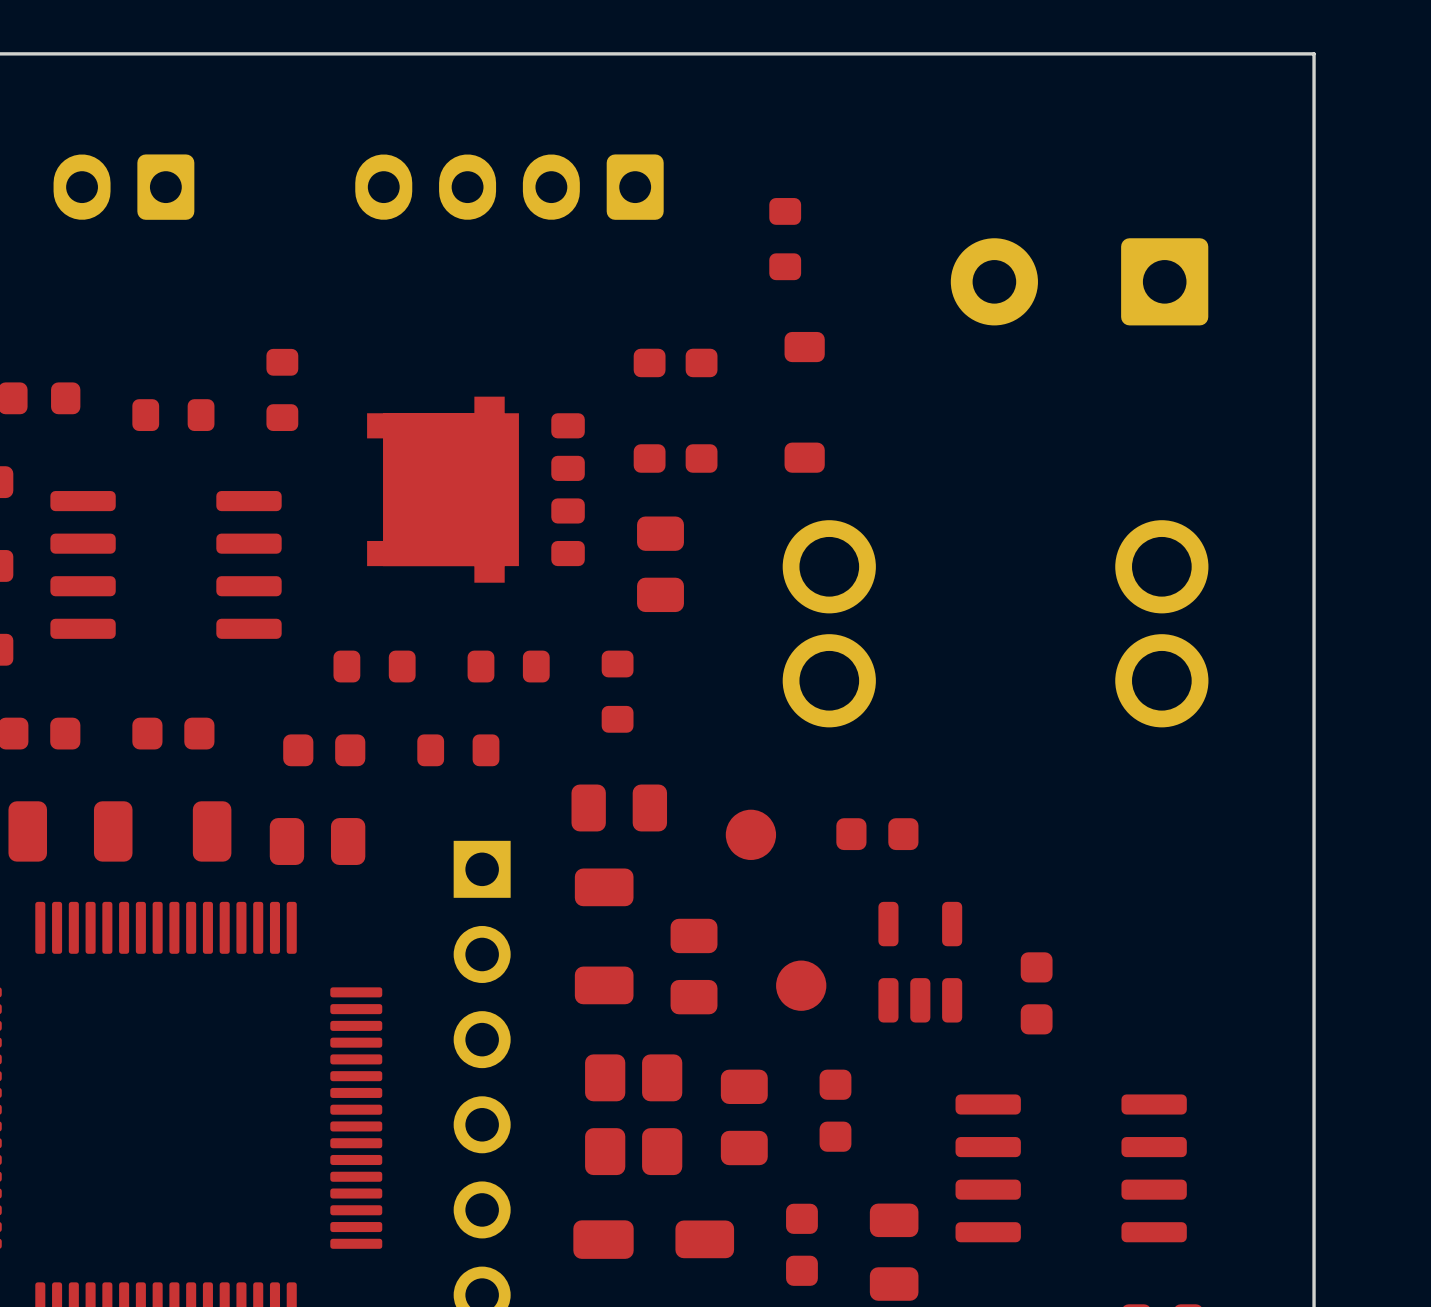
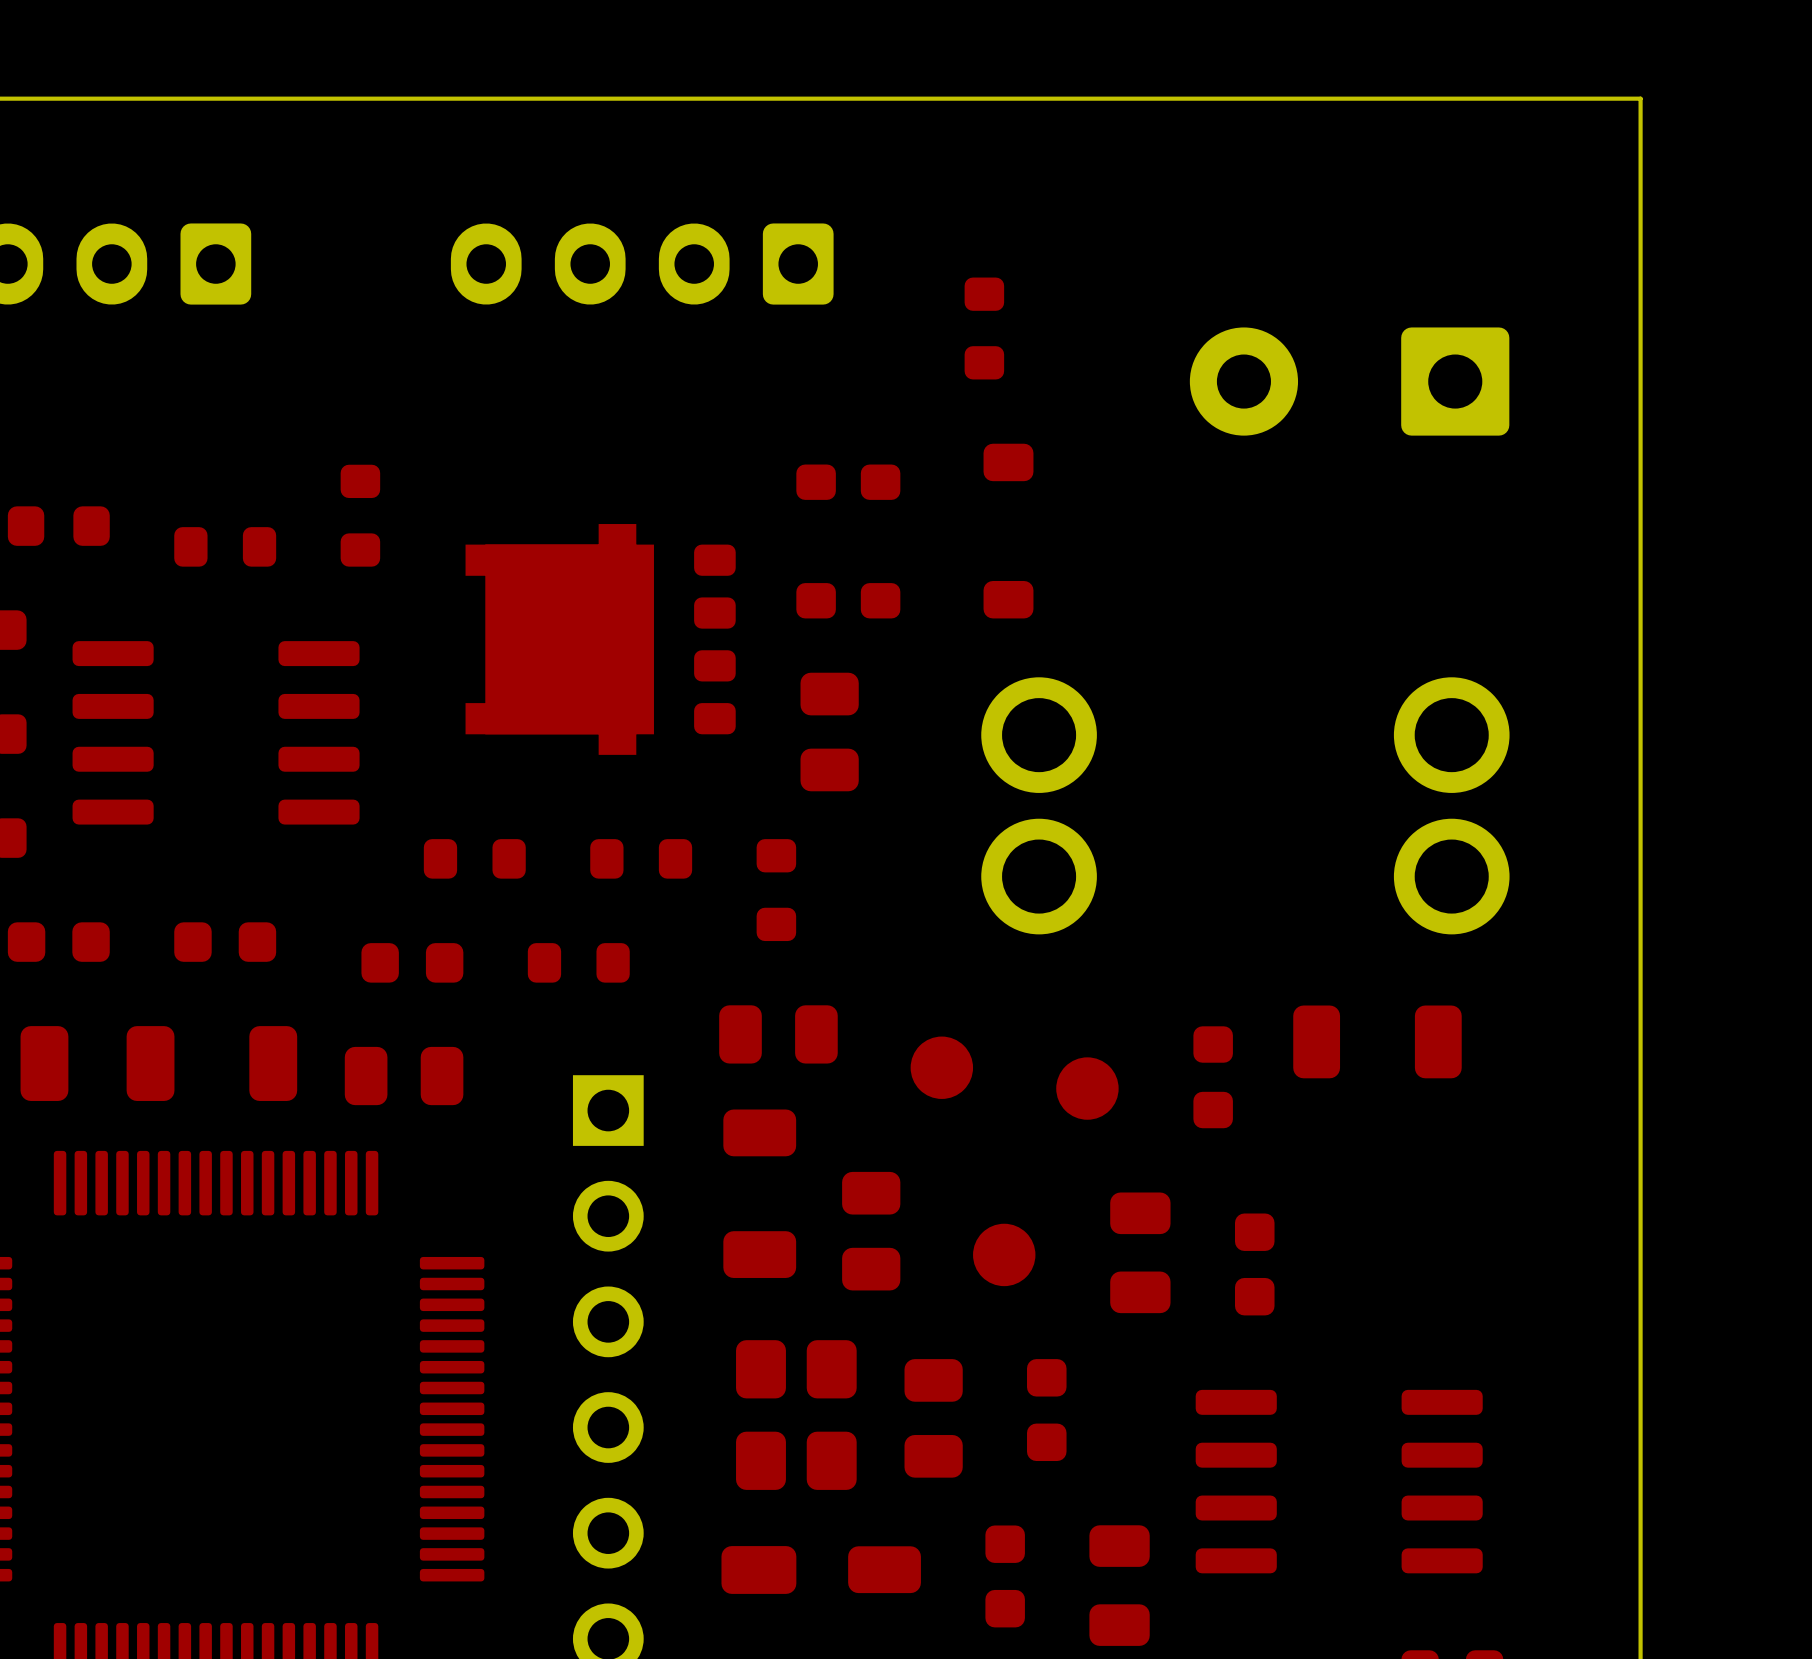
part: none -> (1377, 1041)
part footprint: [836, 818, 919, 851] -> [1056, 1057, 1119, 1120]
part: none -> (1213, 1077)
part footprint: [878, 901, 963, 1023] -> [1110, 1192, 1171, 1314]
part position: (1036, 993) -> (1254, 1264)

